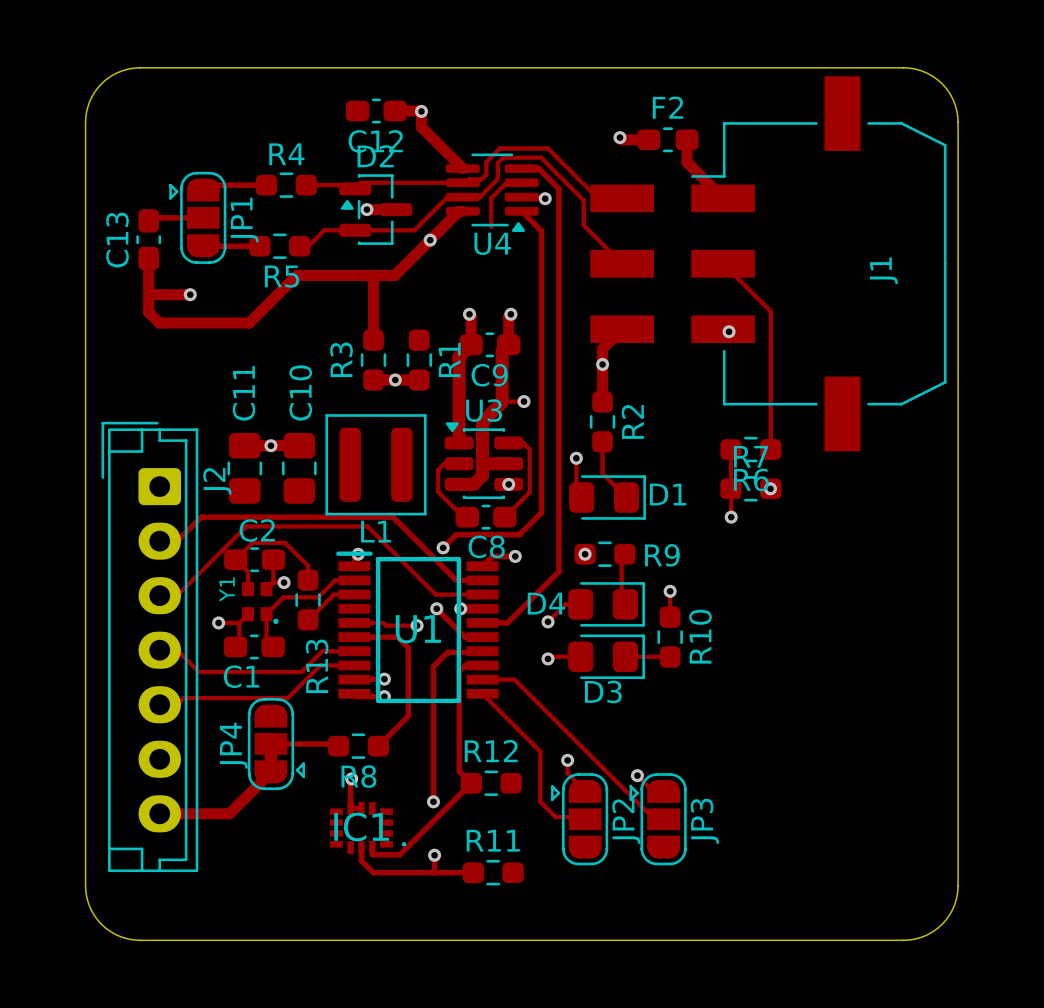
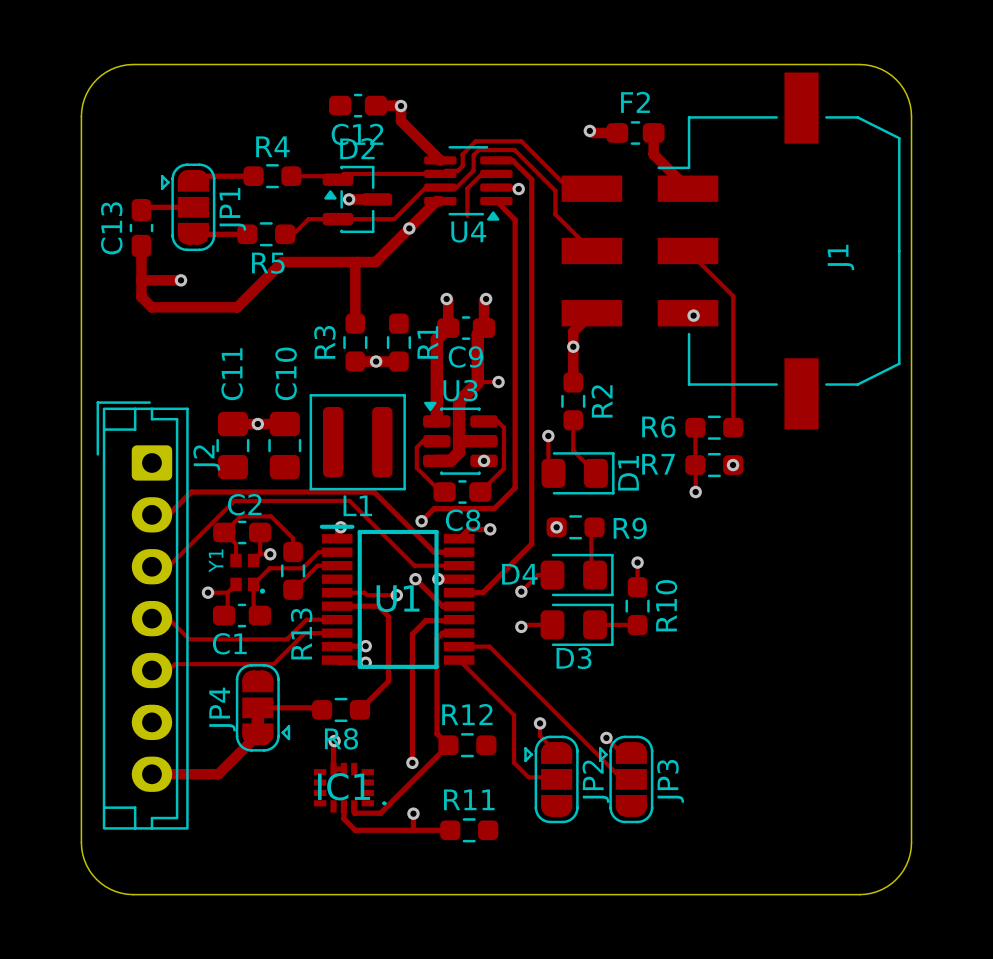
R7 name position: R7 (751, 456) -> R7 (658, 464)
R6 name position: R6 (751, 479) -> R6 (658, 426)
D1 name rotation: 0° (668, 494) -> 90° counterclockwise (628, 473)

